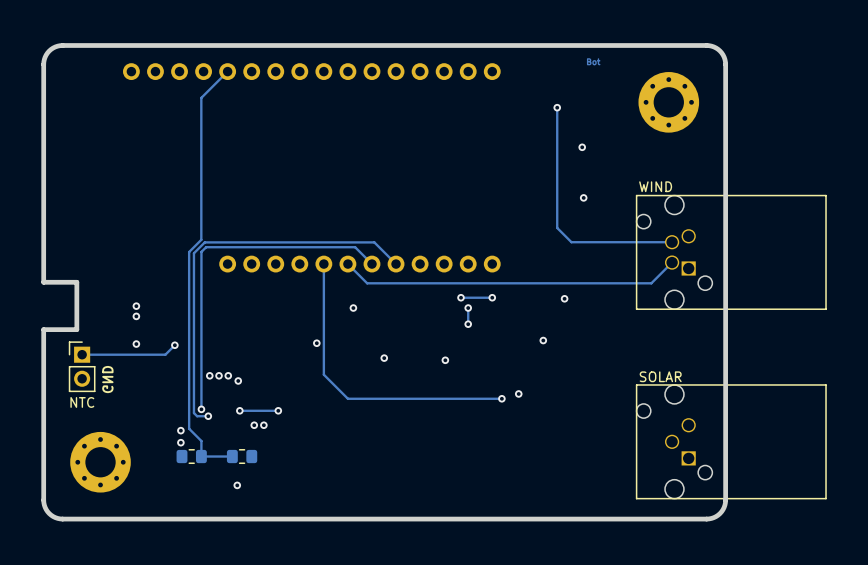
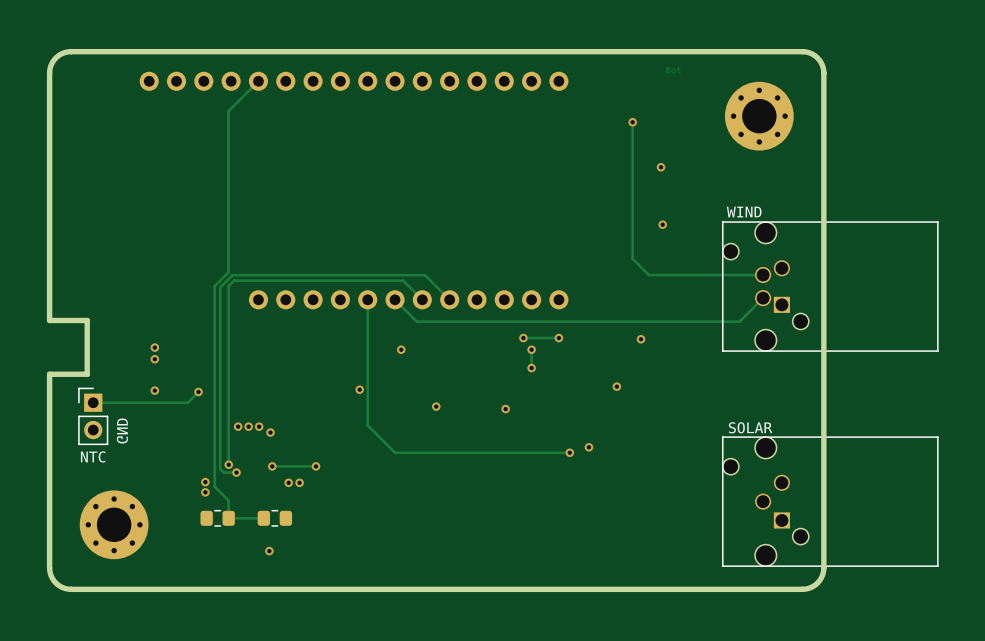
via: none -> (205, 482)
via: (180, 430) -> none
via: none -> (205, 492)
via: (180, 442) -> none

